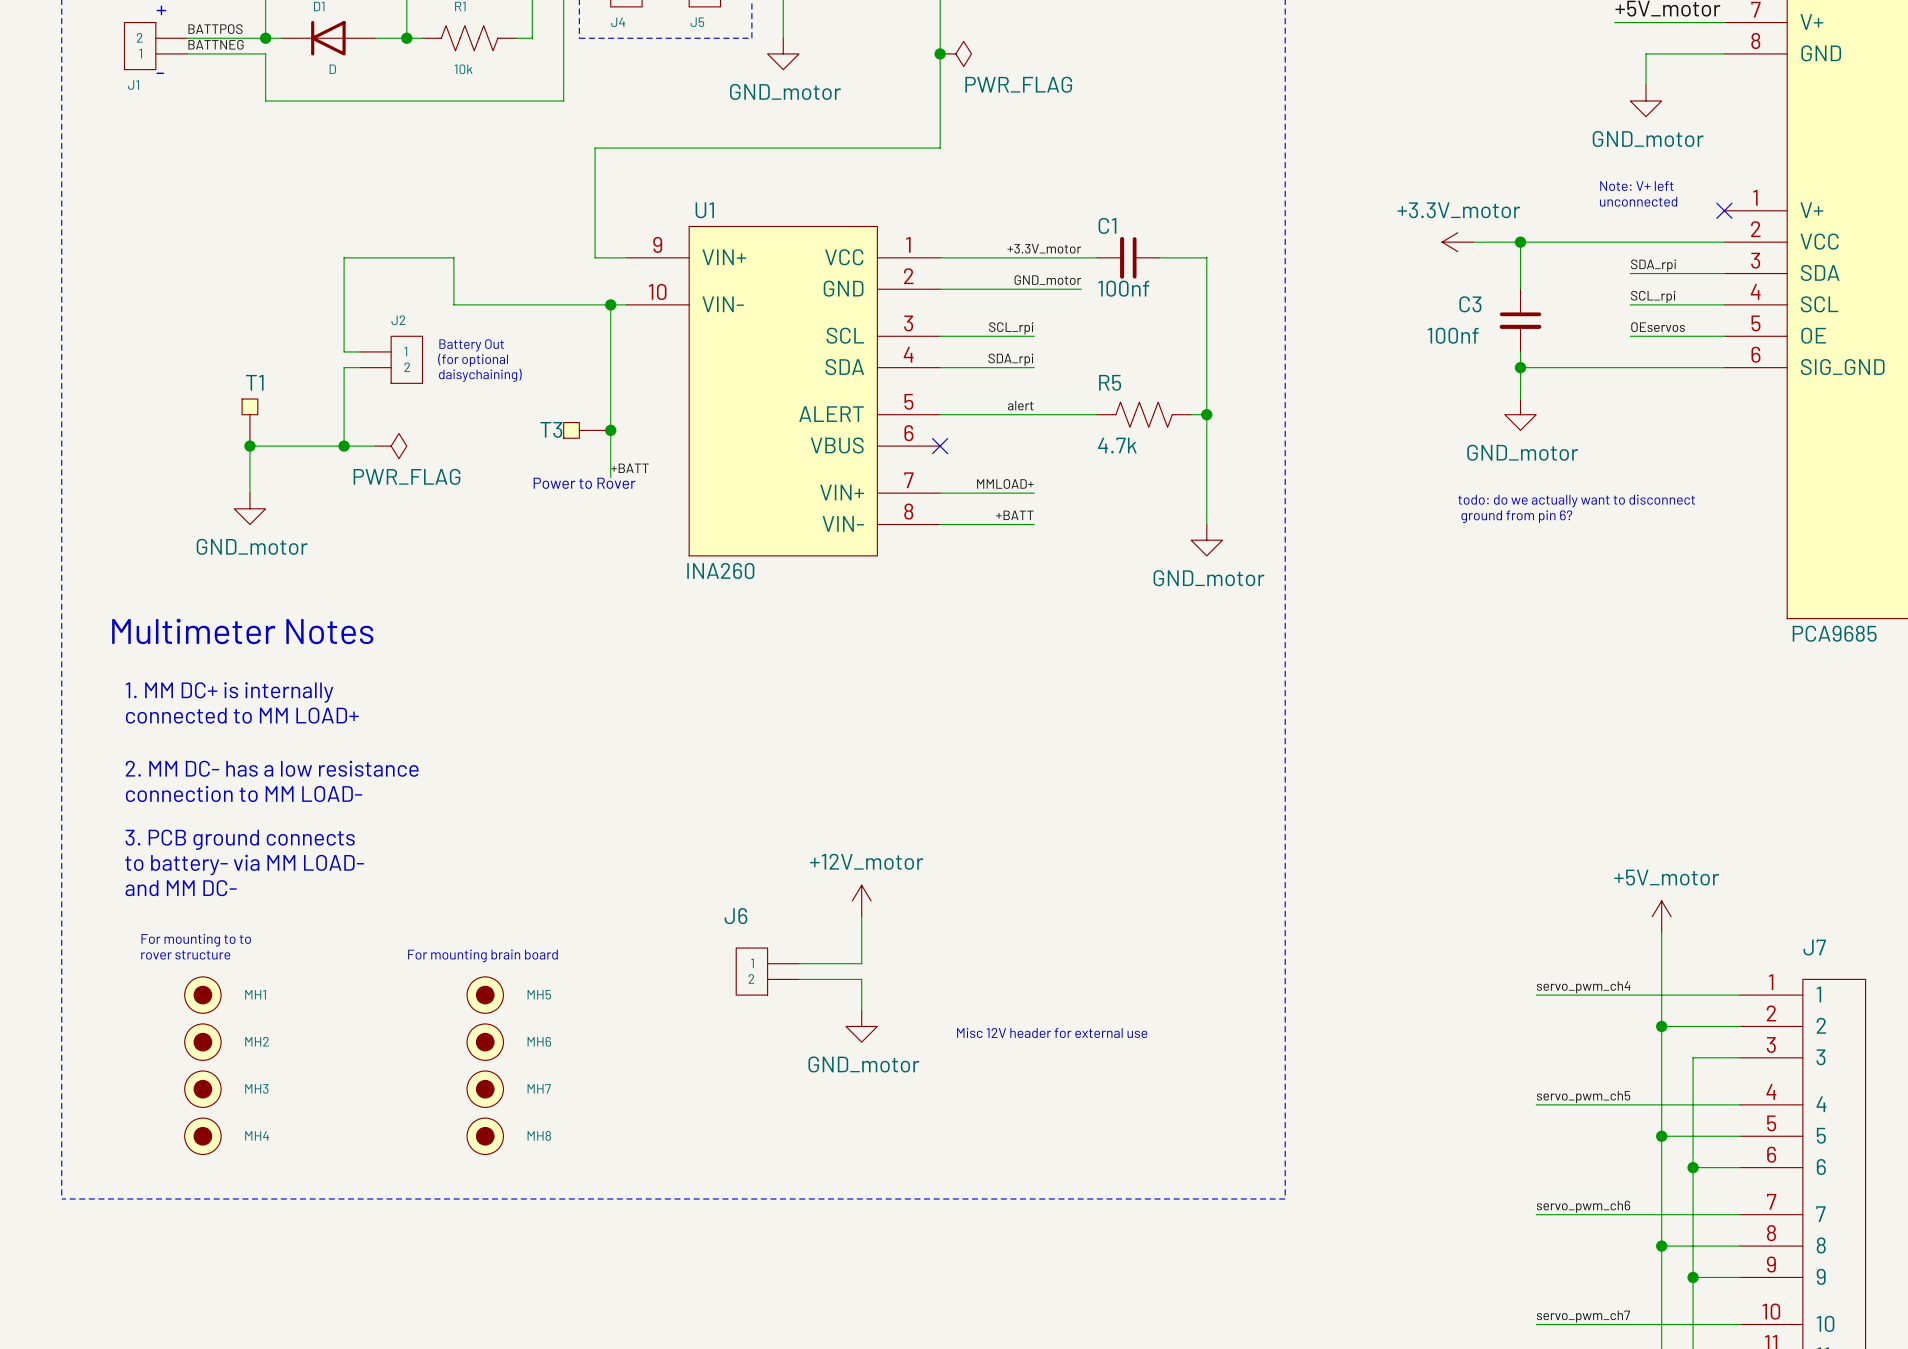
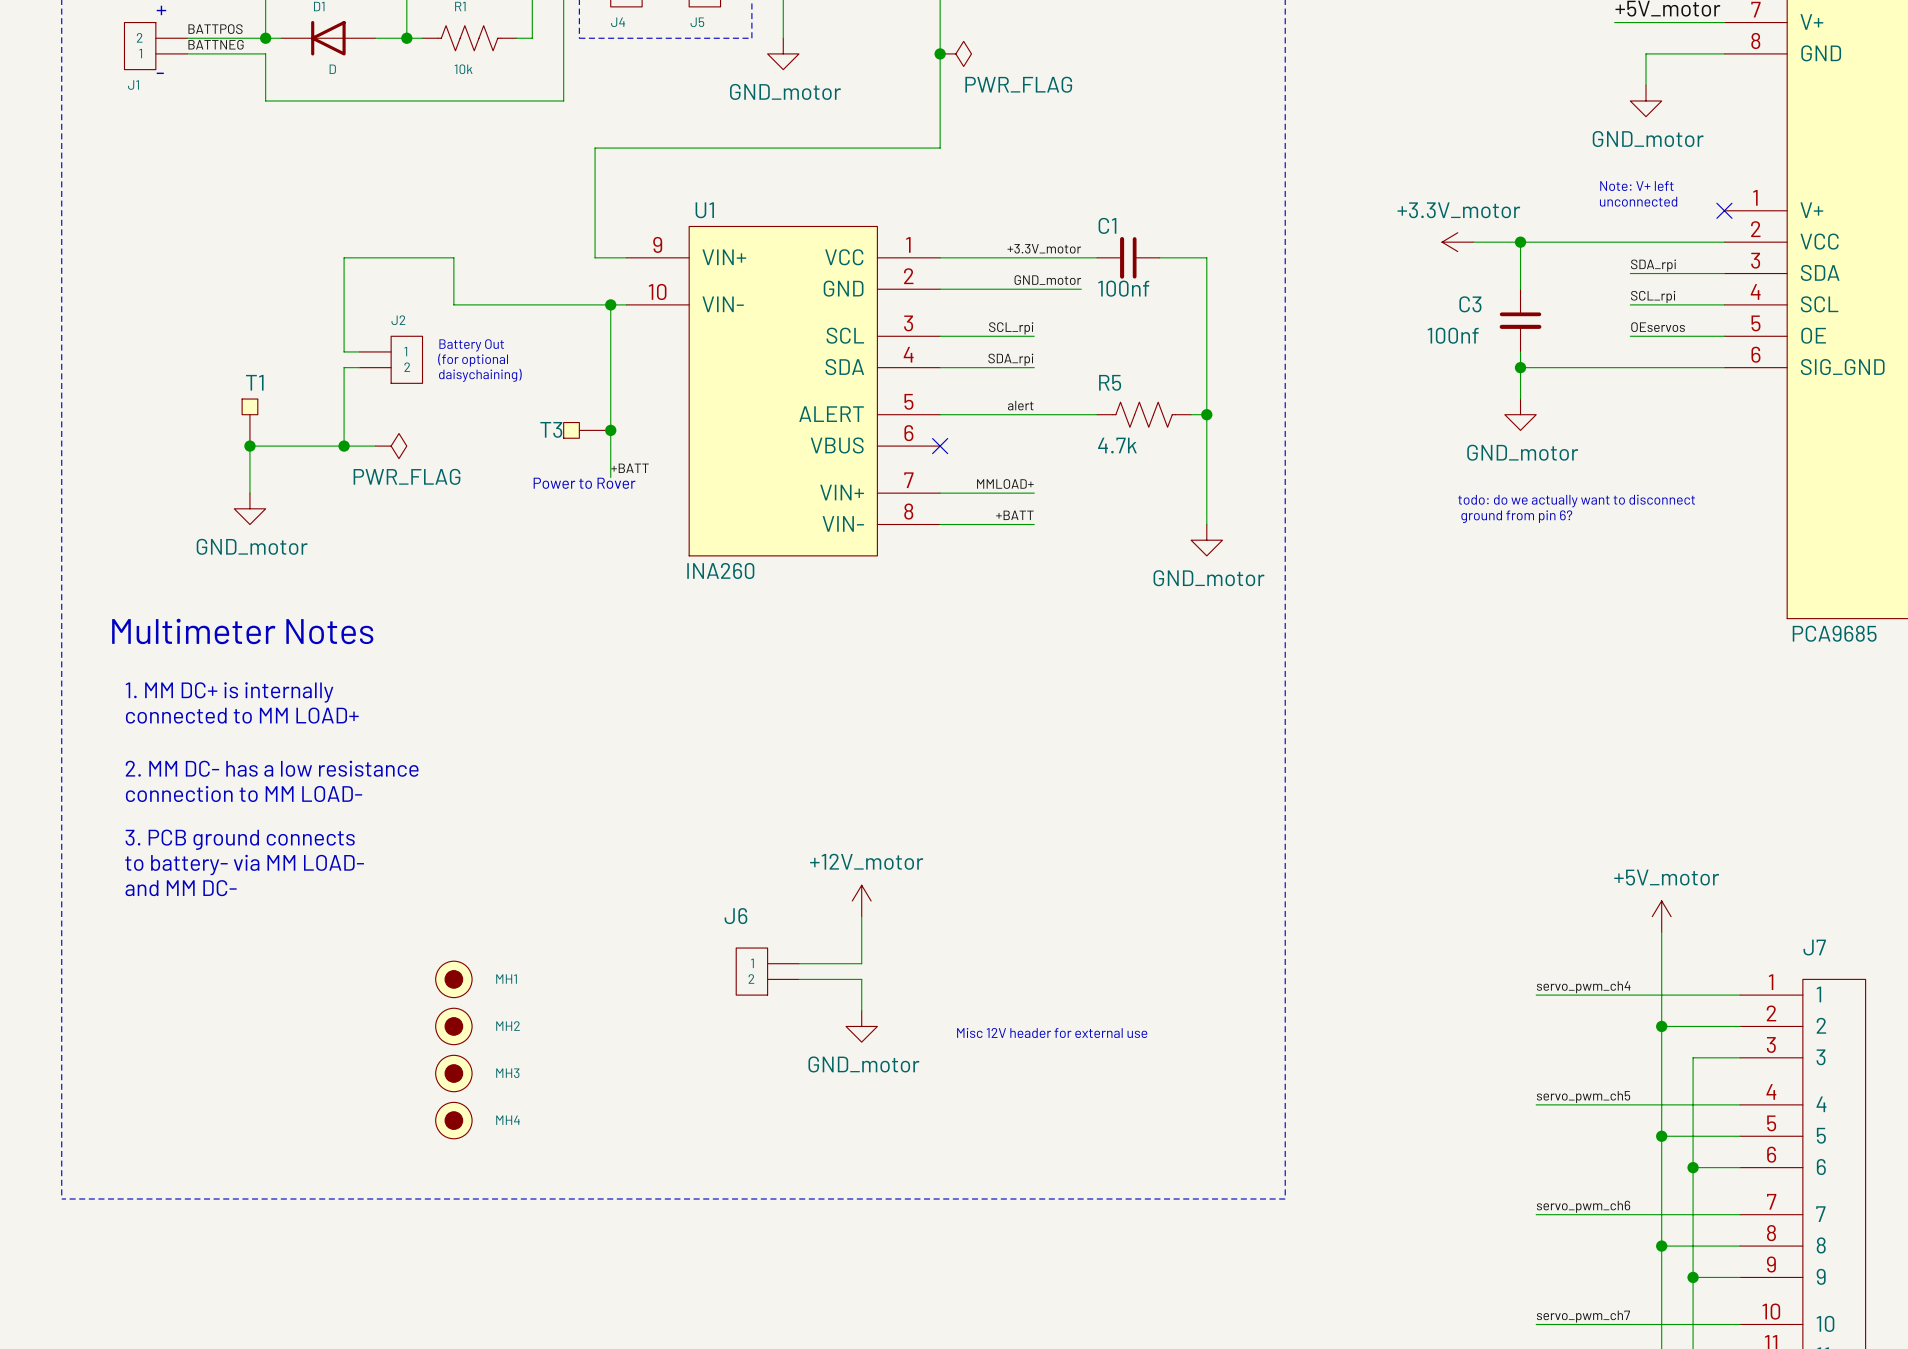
text: For mounting to to (196, 940) -> none
text: rover structure (185, 955) -> none
text: For mounting brain board (482, 955) -> none
MH1 position: (202, 995) -> (453, 979)
MH5: (485, 995) -> none
MH2 position: (202, 1042) -> (453, 1026)
MH6: (485, 1042) -> none
MH3 position: (202, 1089) -> (453, 1073)
MH7: (485, 1089) -> none
MH4 position: (202, 1136) -> (453, 1120)
MH8: (485, 1136) -> none

